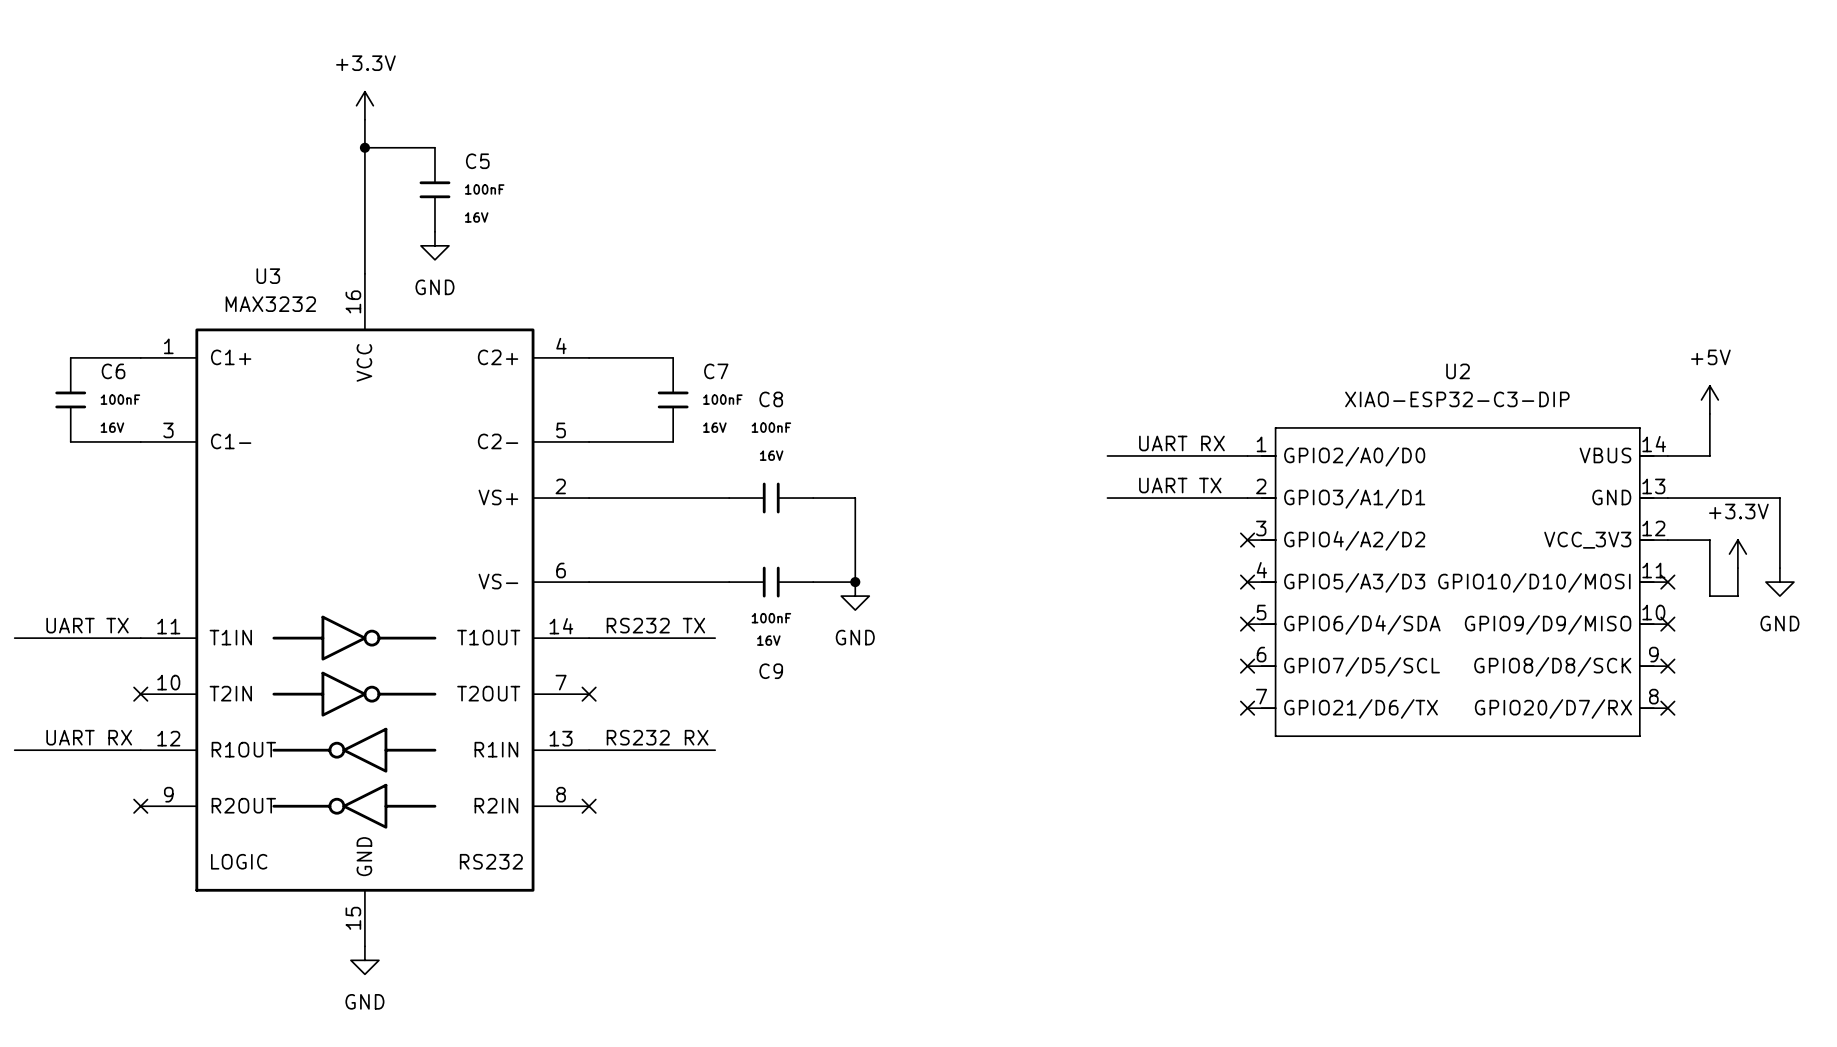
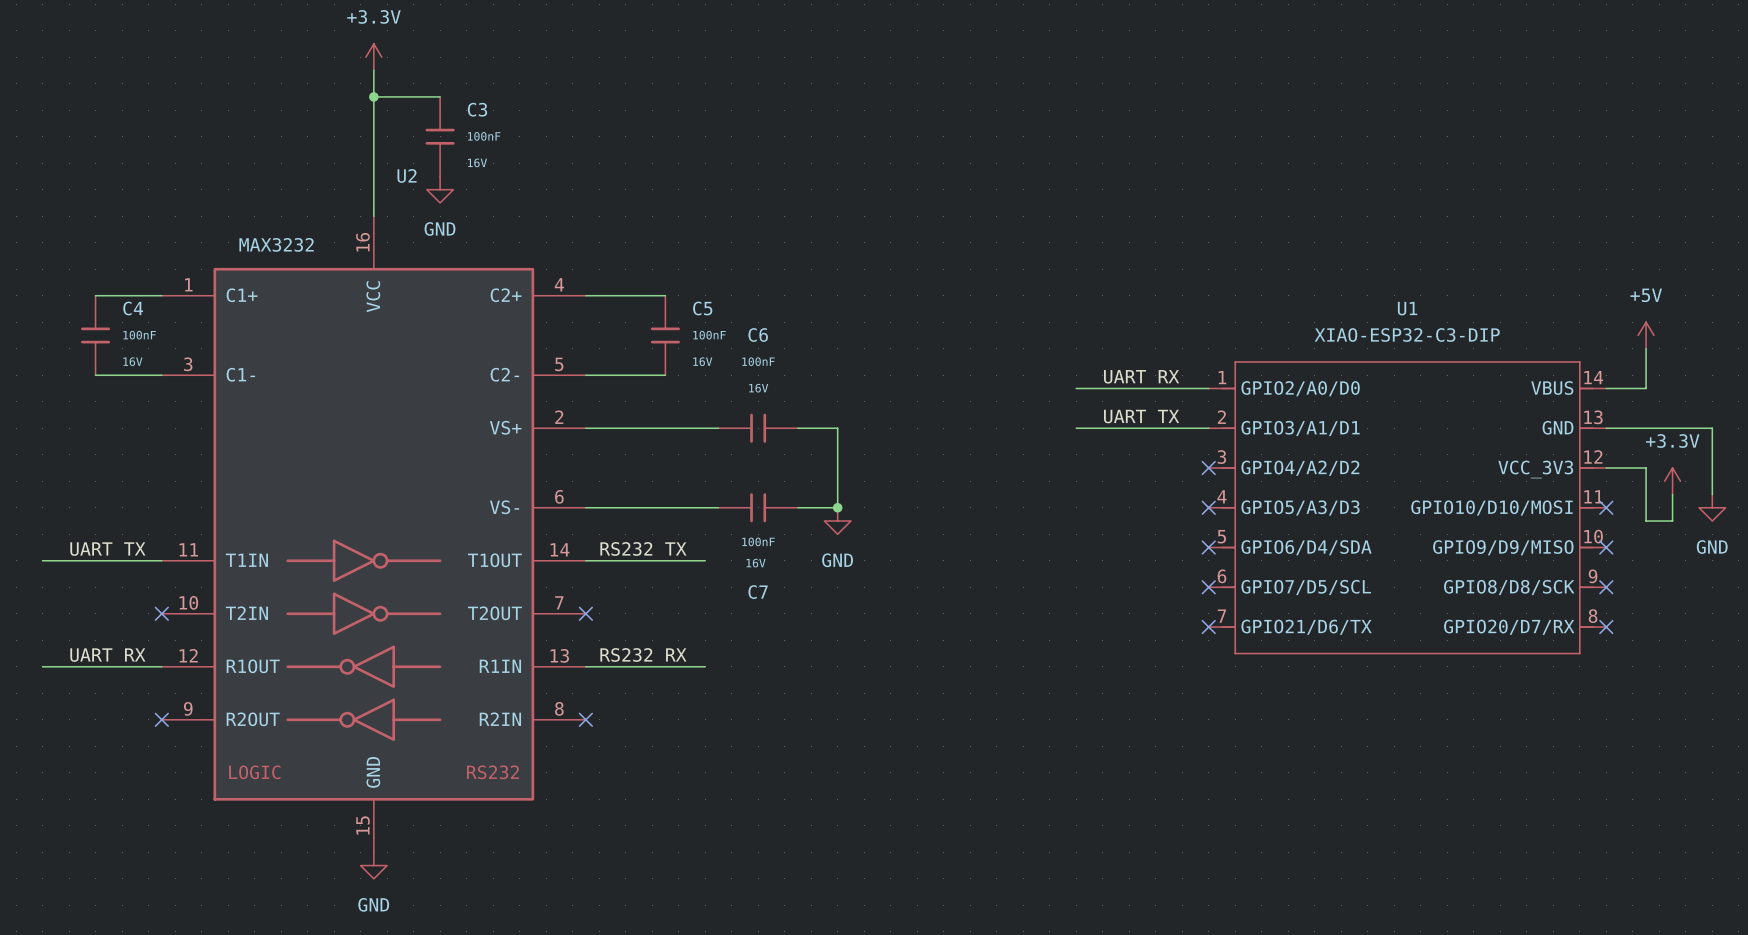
C5 name: C5 (477, 161) -> C3 (477, 109)
U3 name: U3 (268, 276) -> U2 (407, 175)
C6 name: C6 (113, 371) -> C4 (133, 308)
C7 name: C7 (716, 371) -> C5 (702, 308)
U2 name: U2 (1458, 371) -> U1 (1407, 308)
C8 name: C8 (771, 399) -> C6 (758, 335)
C9 name: C9 (771, 671) -> C7 (758, 592)

